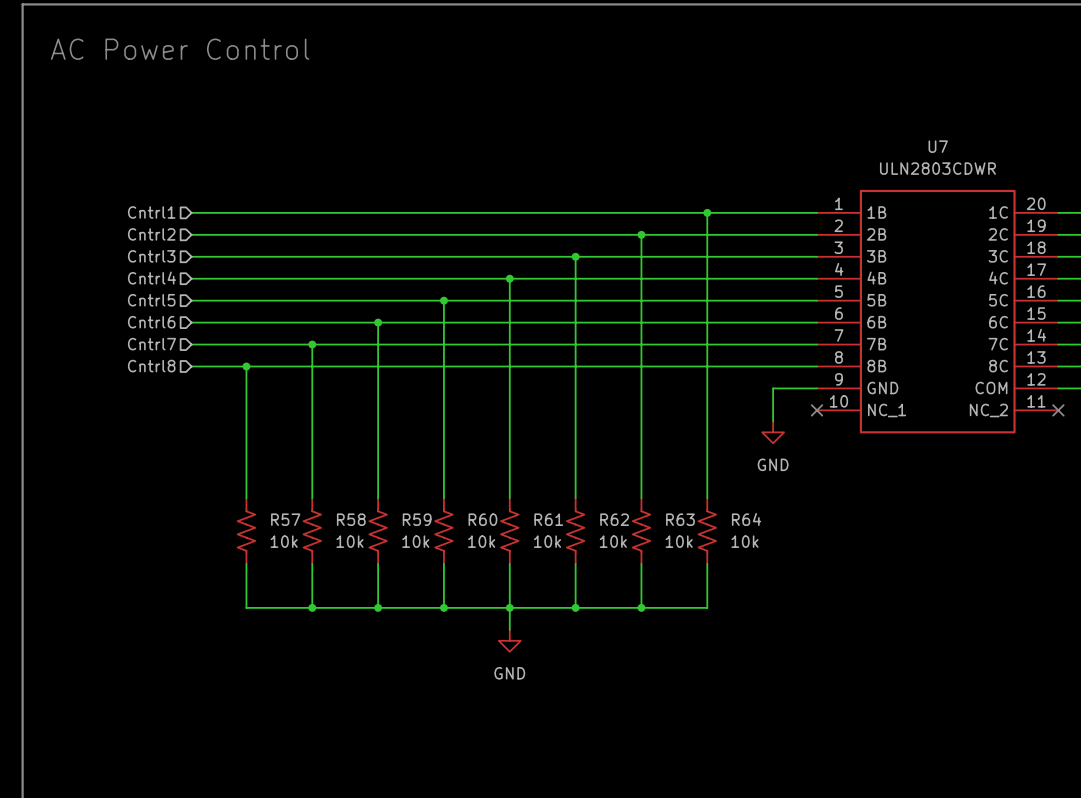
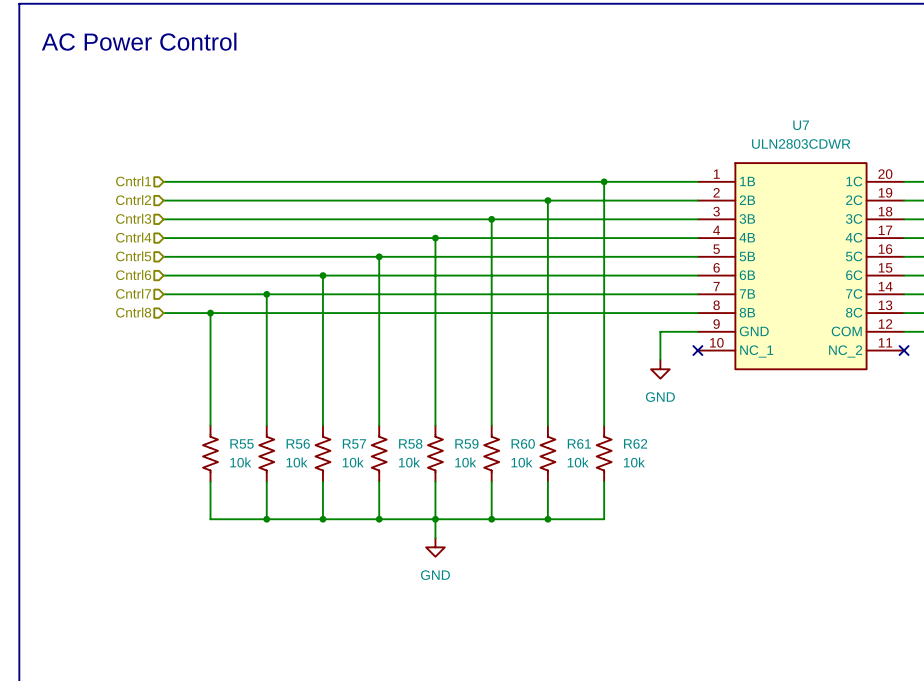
R57 name: R57 (285, 519) -> R55 (242, 443)
R58 name: R58 (351, 519) -> R56 (298, 443)
R59 name: R59 (417, 519) -> R57 (354, 443)
R60 name: R60 (482, 519) -> R58 (410, 443)
R61 name: R61 (548, 519) -> R59 (466, 443)
R62 name: R62 (614, 519) -> R60 (523, 443)
R63 name: R63 (680, 519) -> R61 (579, 443)
R64 name: R64 (746, 519) -> R62 (635, 443)

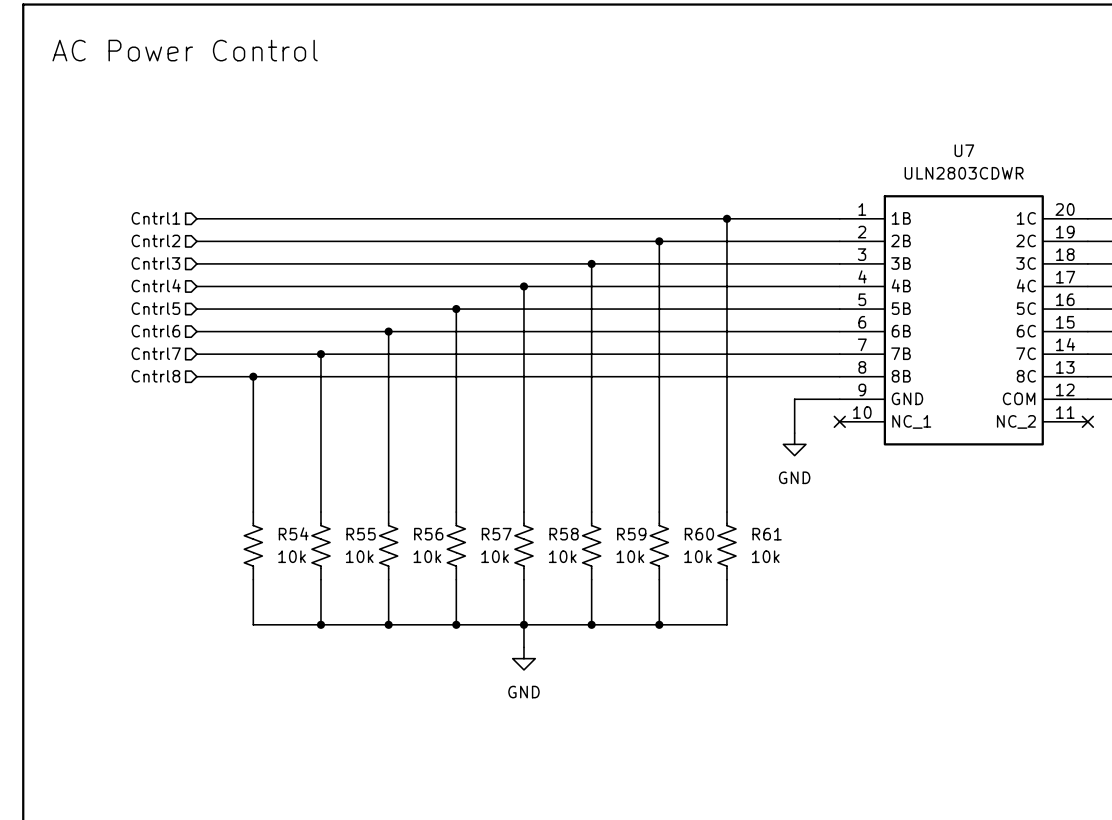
R55 name: R55 (242, 443) -> R54 (293, 533)
R56 name: R56 (298, 443) -> R55 (361, 534)
R57 name: R57 (354, 443) -> R56 (428, 534)
R58 name: R58 (410, 443) -> R57 (496, 534)
R59 name: R59 (466, 443) -> R58 (564, 534)
R60 name: R60 (523, 443) -> R59 (631, 534)
R61 name: R61 (579, 443) -> R60 (699, 534)
R62 name: R62 (635, 443) -> R61 (767, 534)

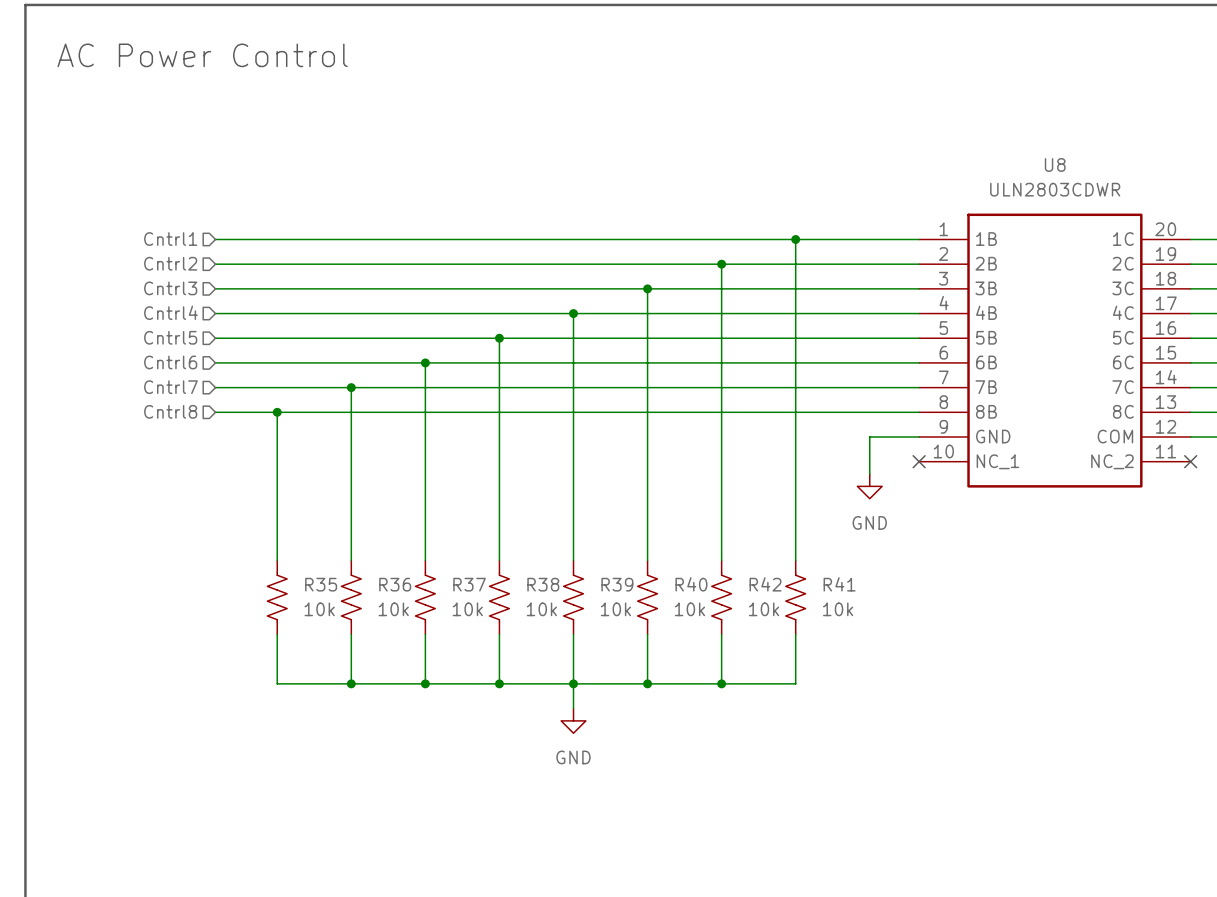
U7 name: U7 (964, 150) -> U8 (1055, 164)
R54 name: R54 (293, 533) -> R35 (321, 584)
R55 name: R55 (361, 534) -> R36 (395, 584)
R56 name: R56 (428, 534) -> R37 (469, 584)
R57 name: R57 (496, 534) -> R38 (543, 584)
R58 name: R58 (564, 534) -> R39 (617, 584)
R59 name: R59 (631, 534) -> R40 (691, 584)
R60 name: R60 (699, 534) -> R42 (765, 584)
R61 name: R61 (767, 534) -> R41 (839, 584)

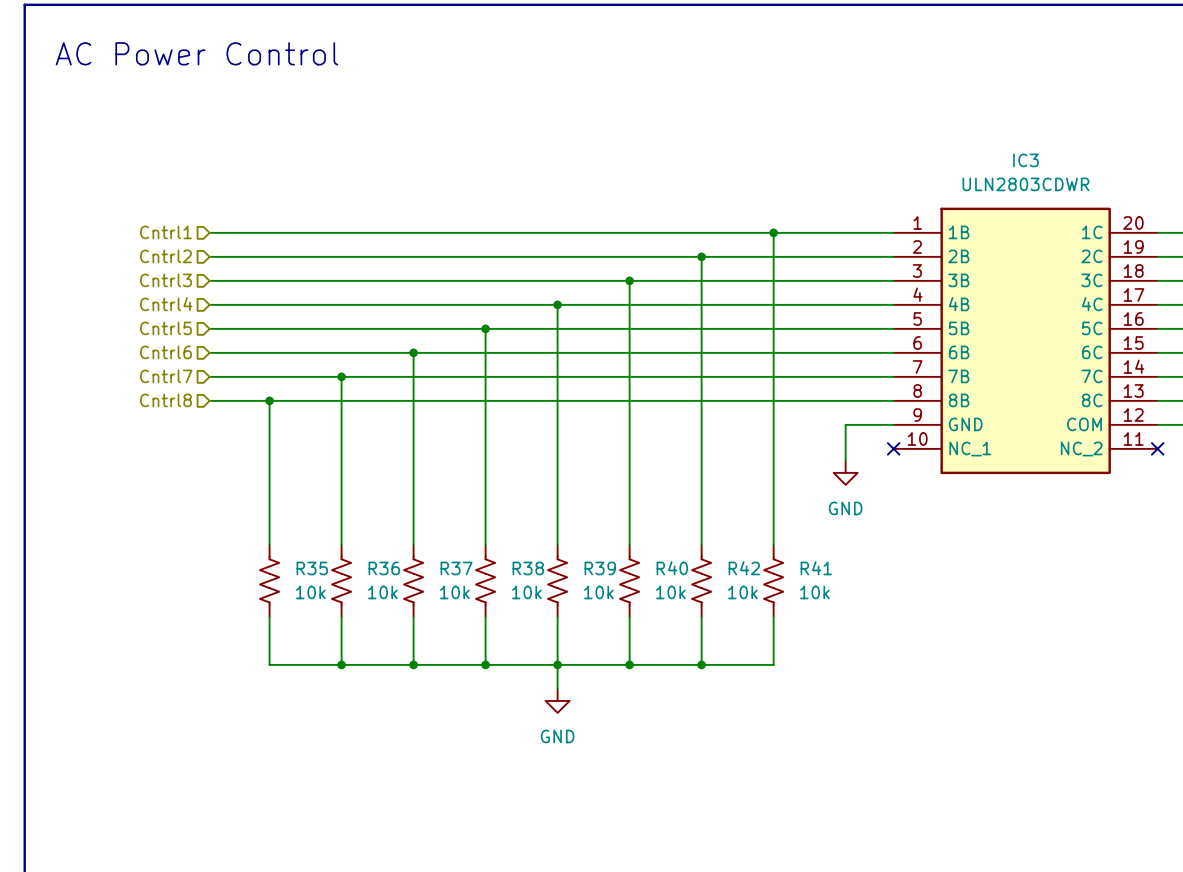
U8 name: U8 (1055, 164) -> IC3 (1025, 160)

